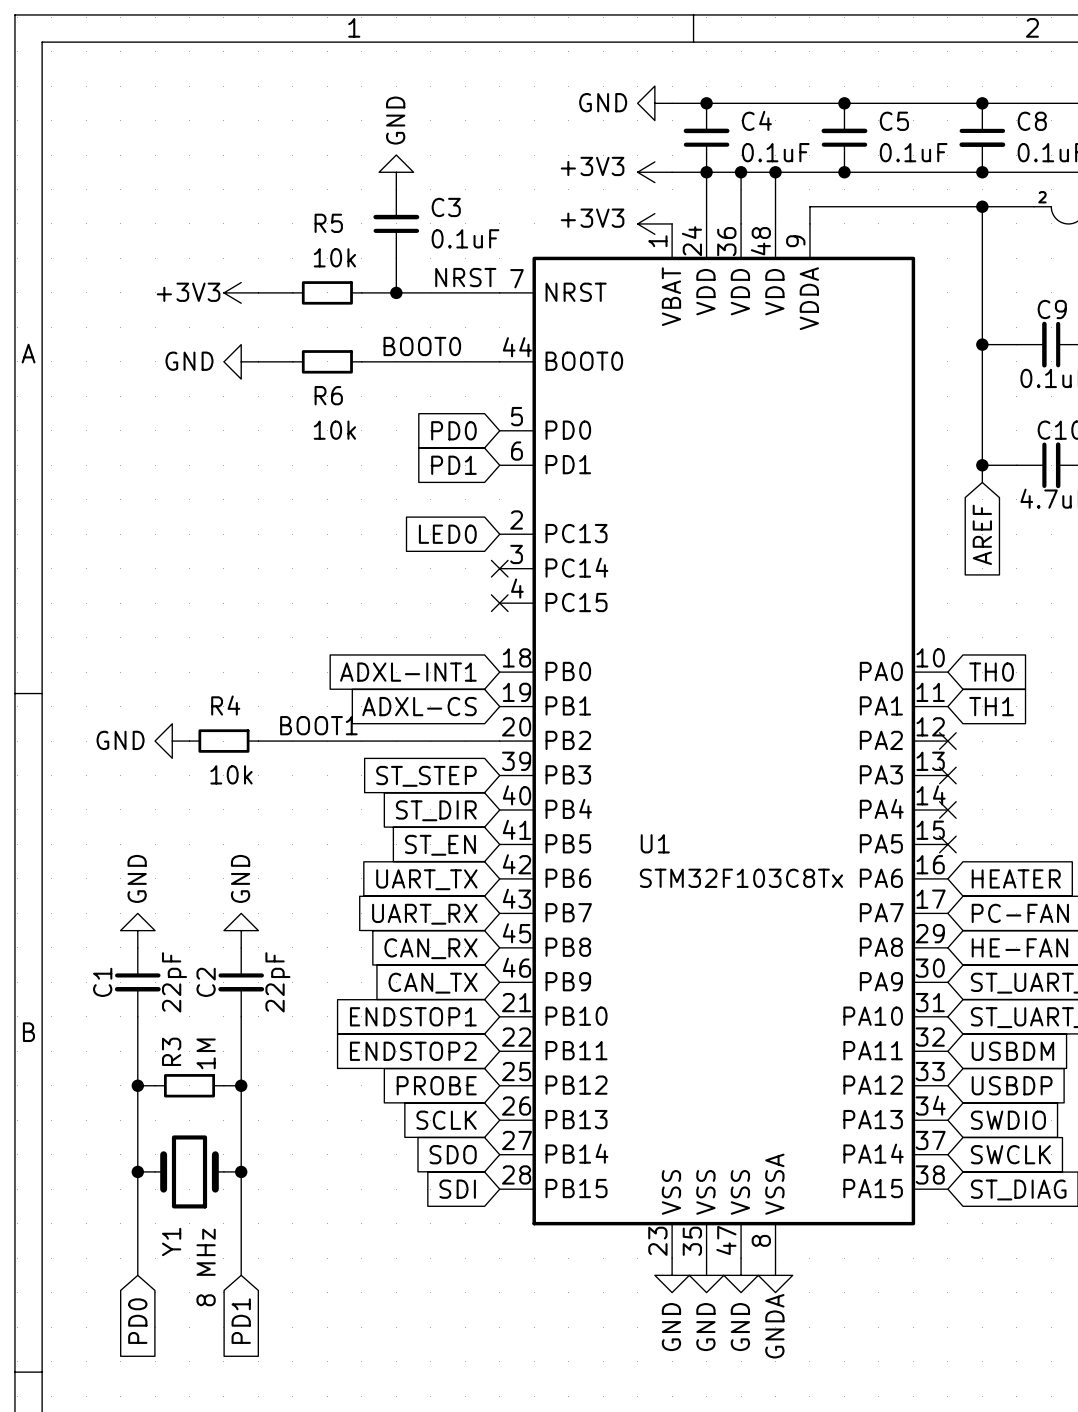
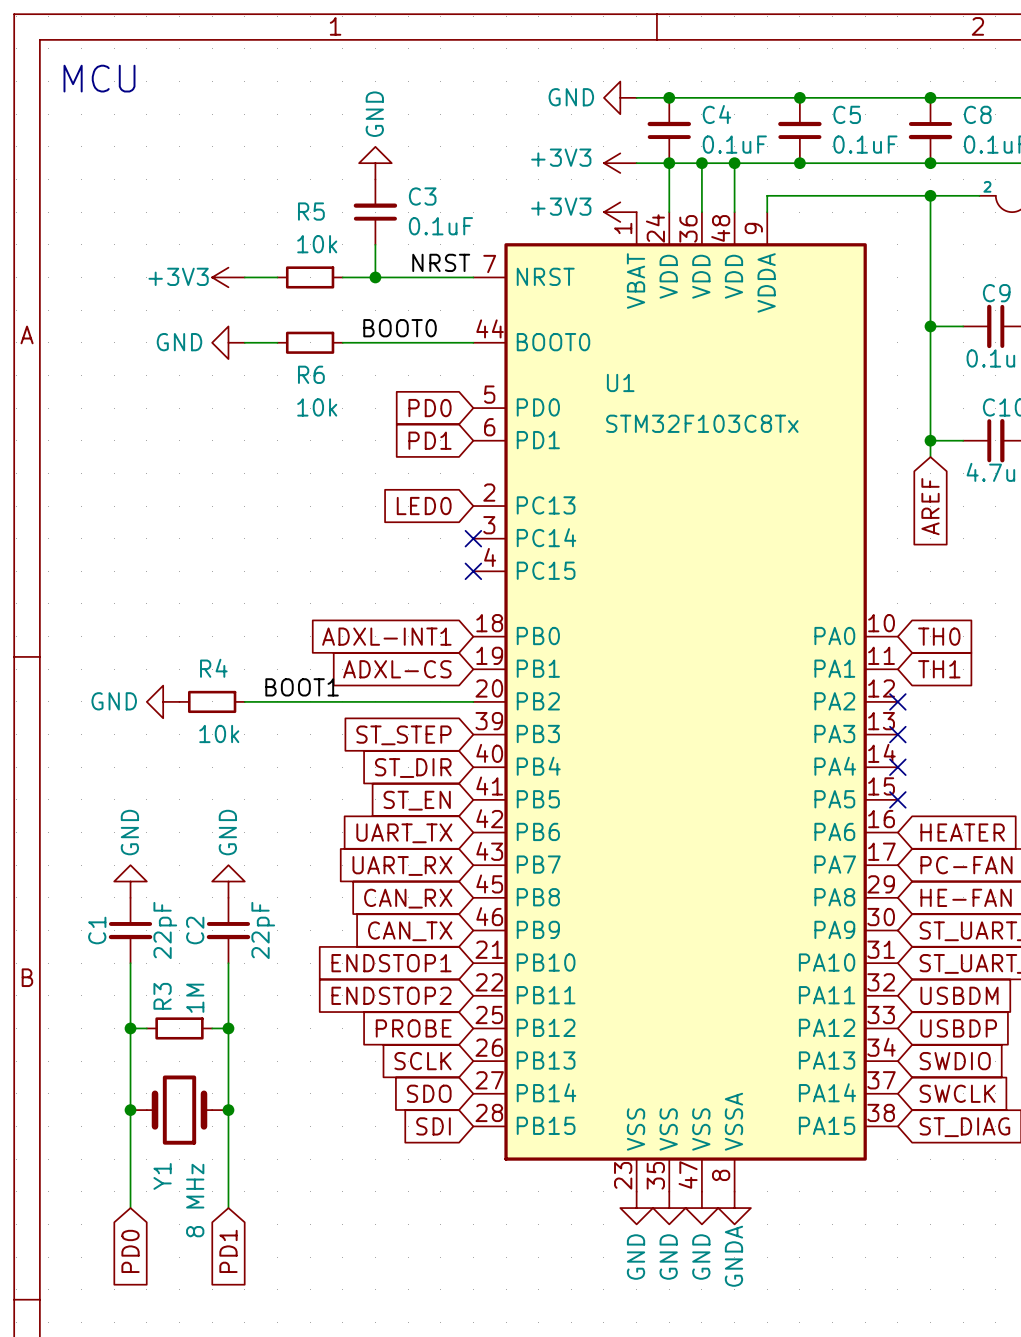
text: none -> MCU (99, 78)
U1 name position: U1 (655, 843) -> U1 (620, 382)
U1 value position: STM32F103C8Tx (741, 878) -> STM32F103C8Tx (702, 423)

